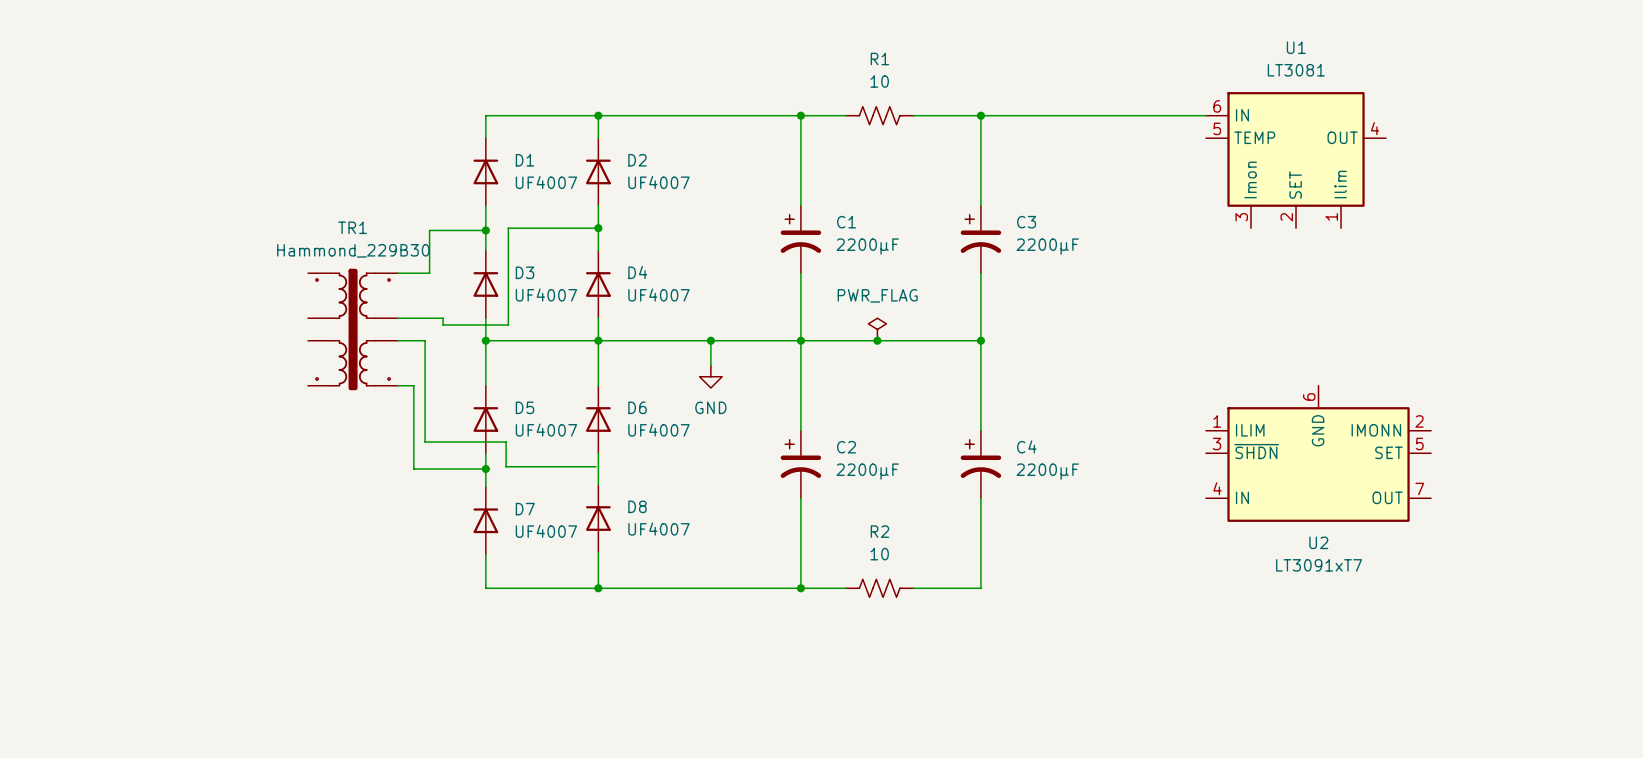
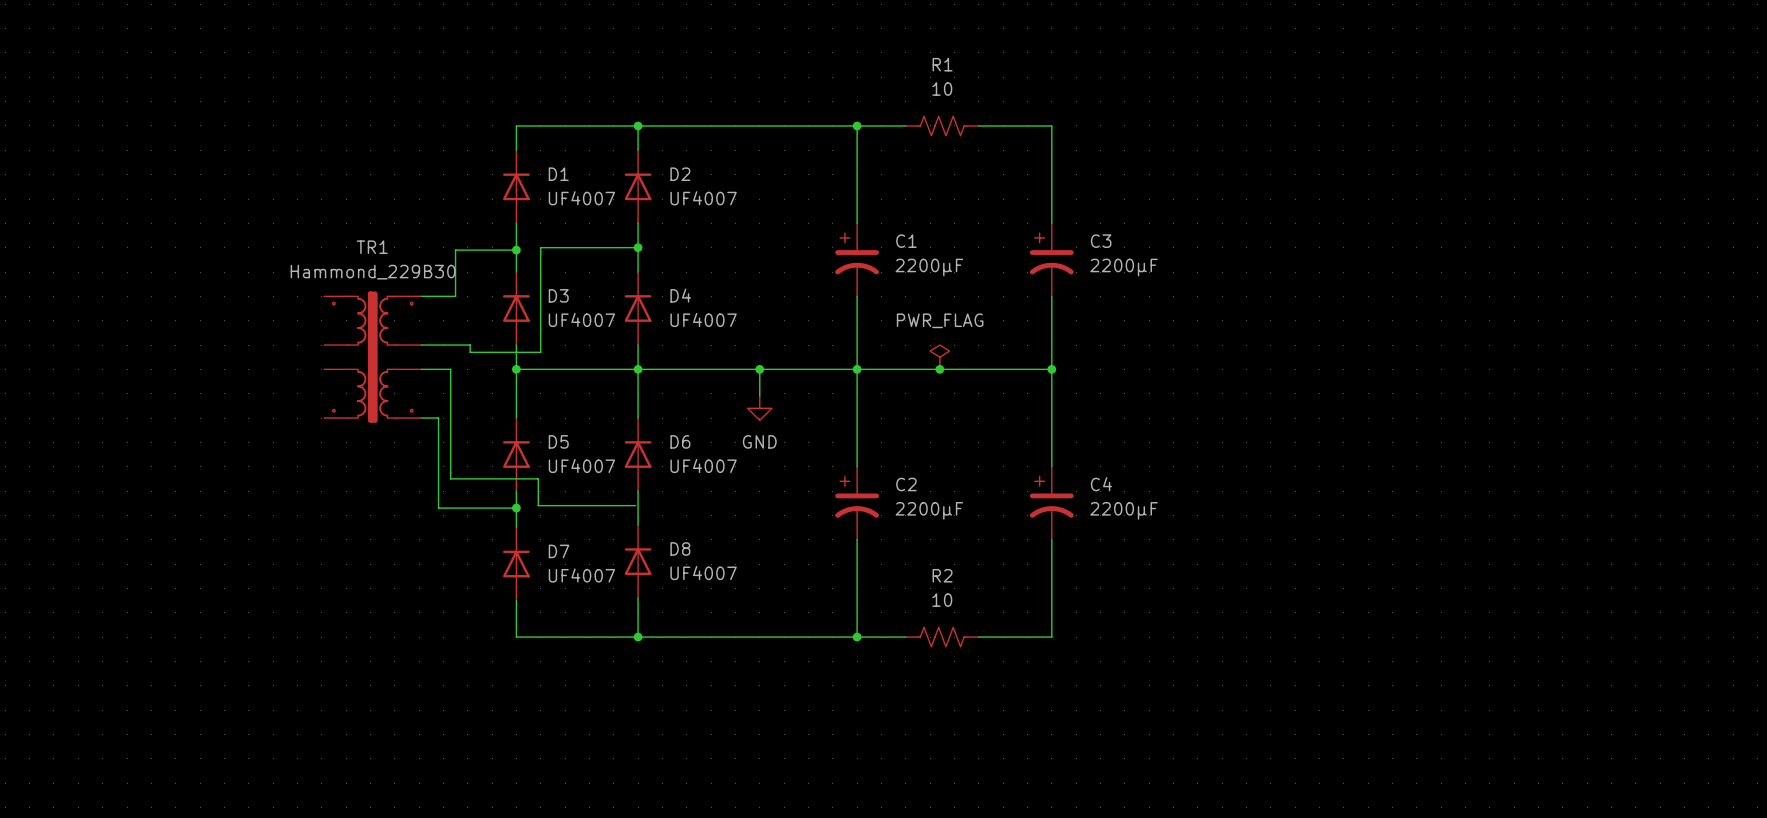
wire: (980, 115) (1205, 115) -> none
junction: (980, 115) -> none
U1: LT3081 (1296, 160) -> none
U2: LT3091xT7 (1318, 453) -> none

